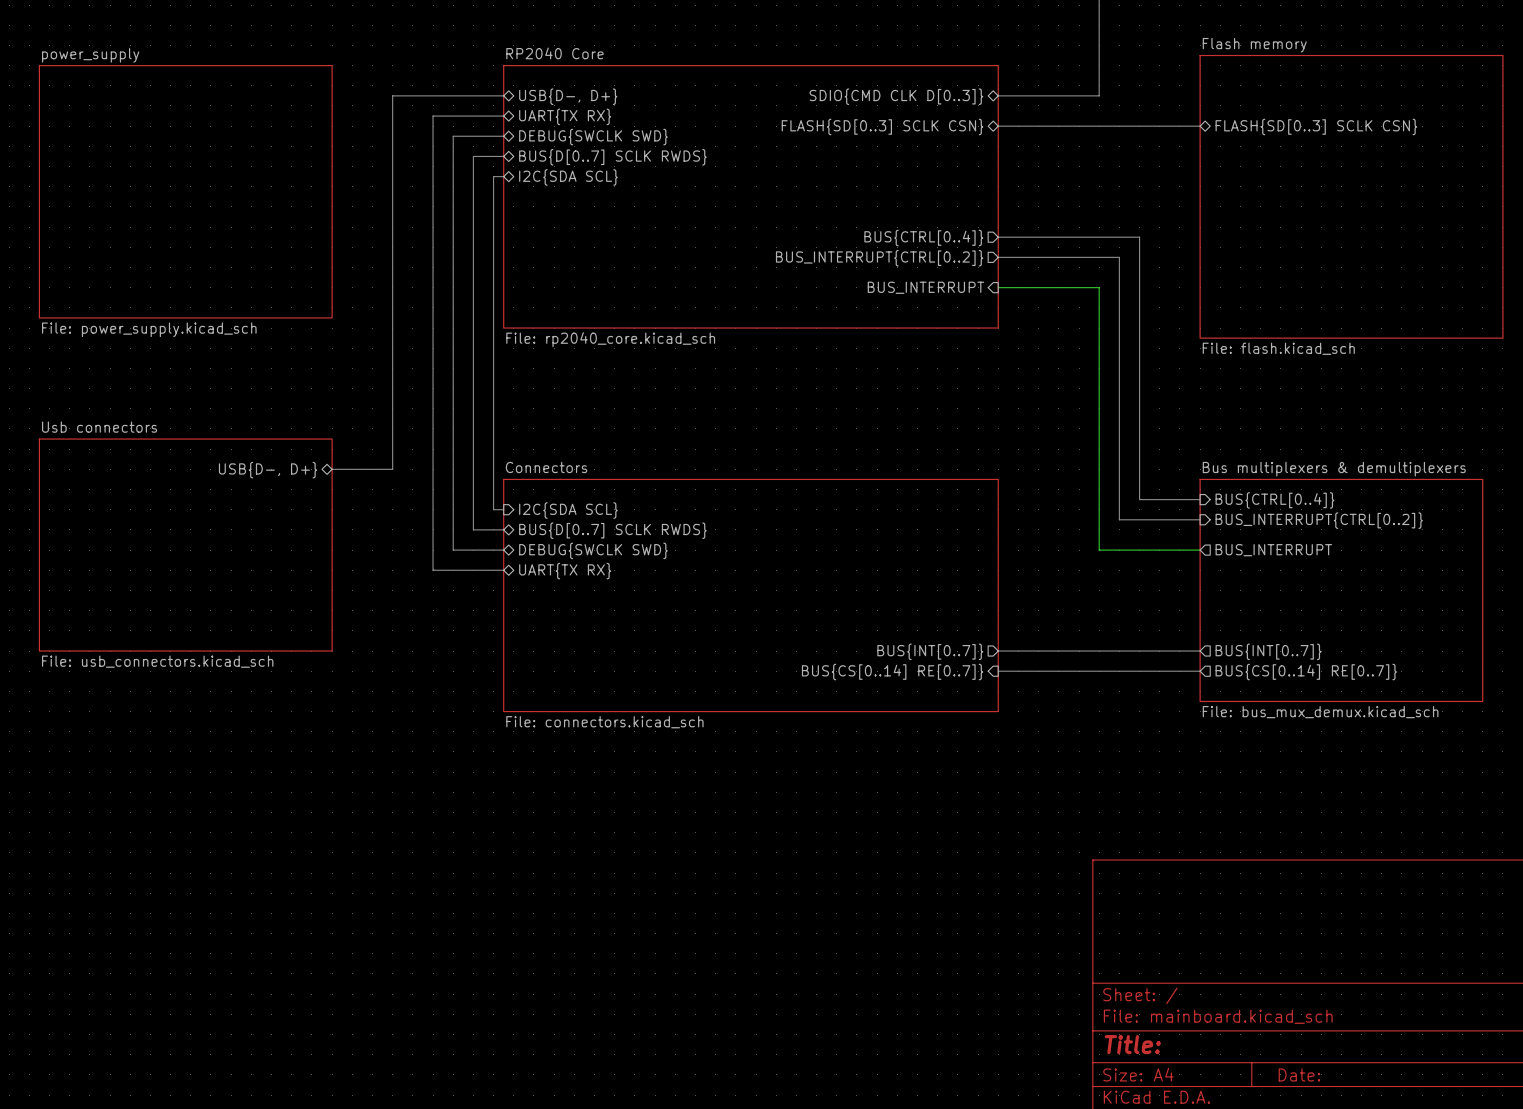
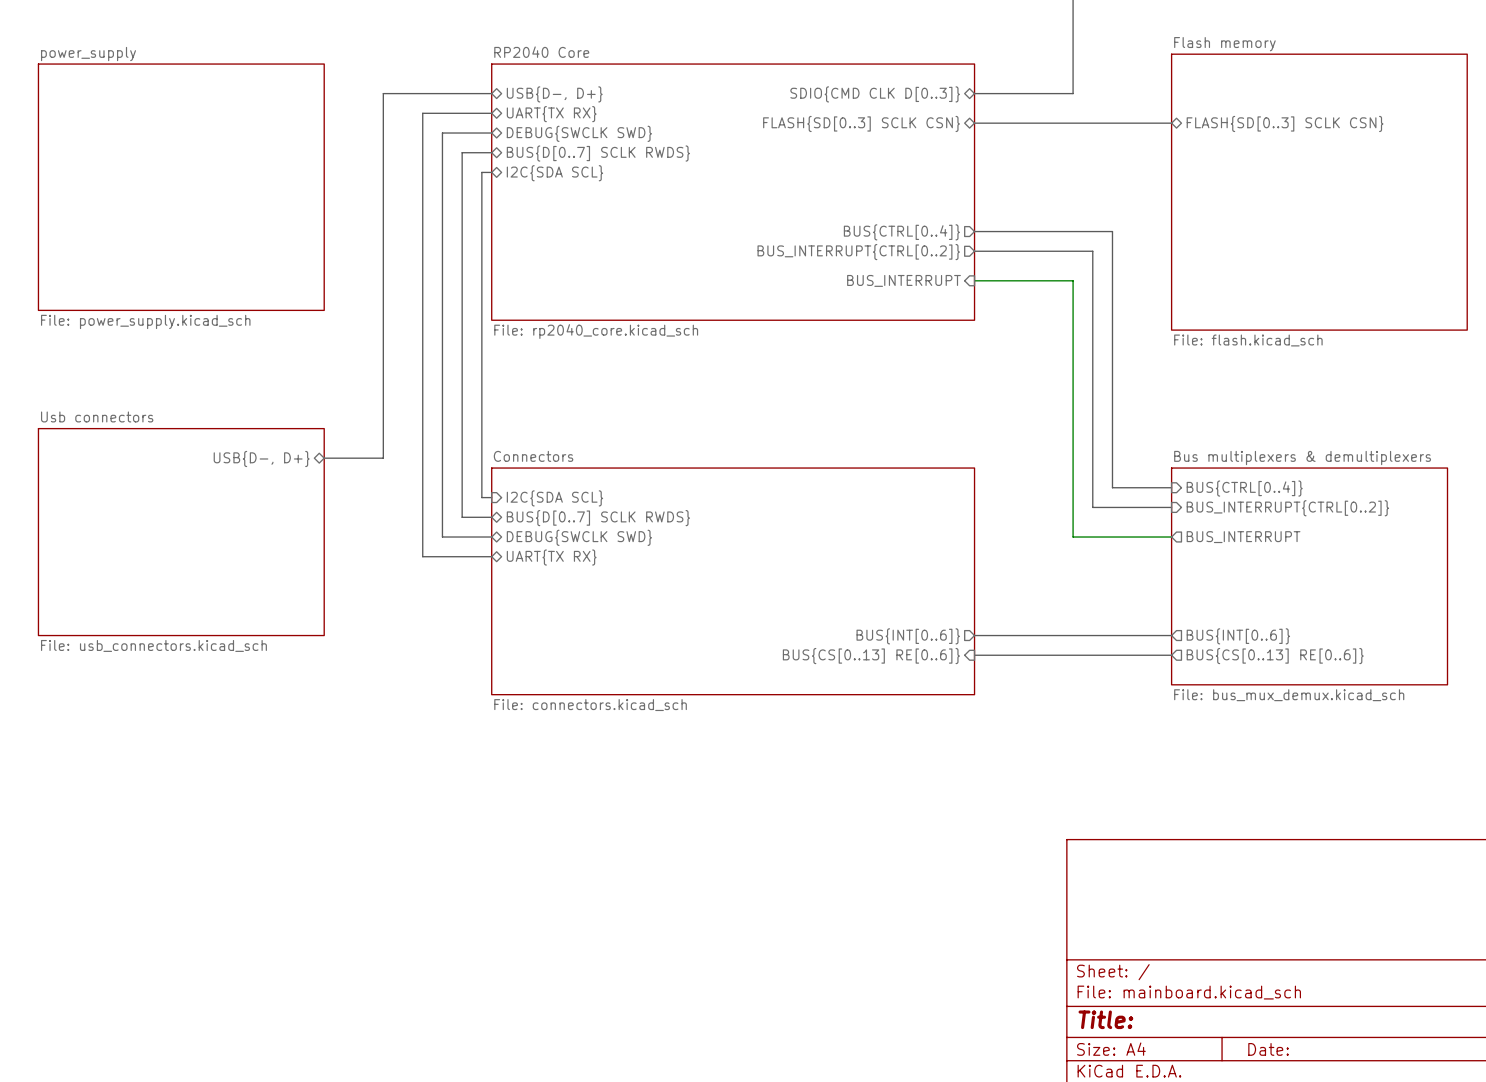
sheet pin: BUS{INT[0..7]} (930, 651) -> BUS{INT[0..6]} (908, 636)
sheet pin: BUS{INT[0..7]} (1268, 651) -> BUS{INT[0..6]} (1238, 636)
sheet pin: BUS{CS[0..14] RE[0..7]} (892, 672) -> BUS{CS[0..13] RE[0..6]} (871, 656)
sheet pin: BUS{CS[0..14] RE[0..7]} (1306, 672) -> BUS{CS[0..13] RE[0..6]} (1275, 656)

